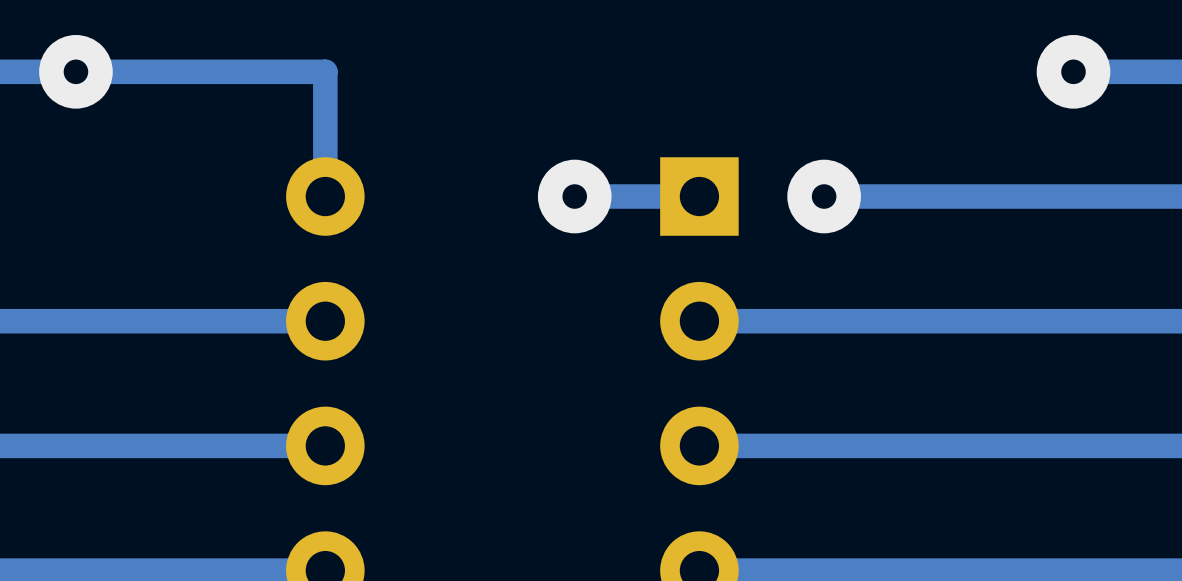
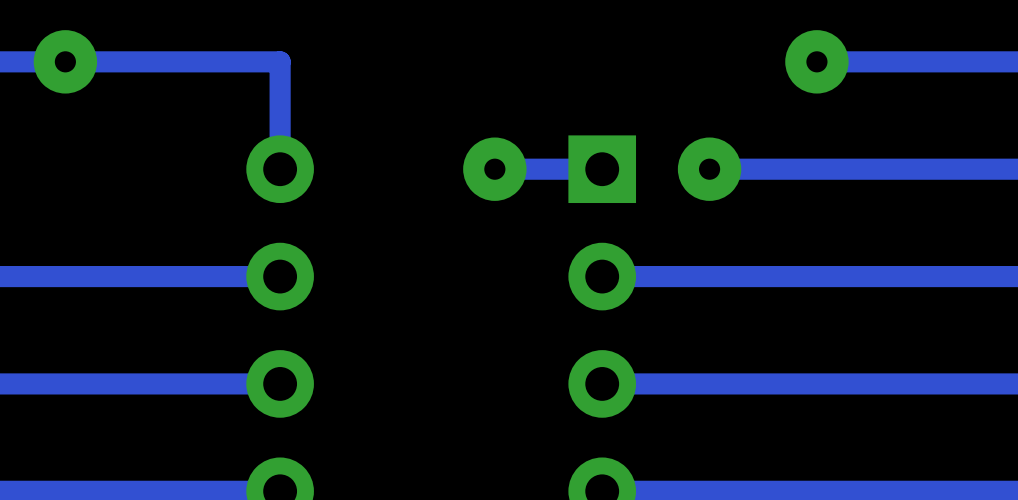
track: none -> (924, 61) (816, 61)
via position: (1073, 71) -> (816, 61)

